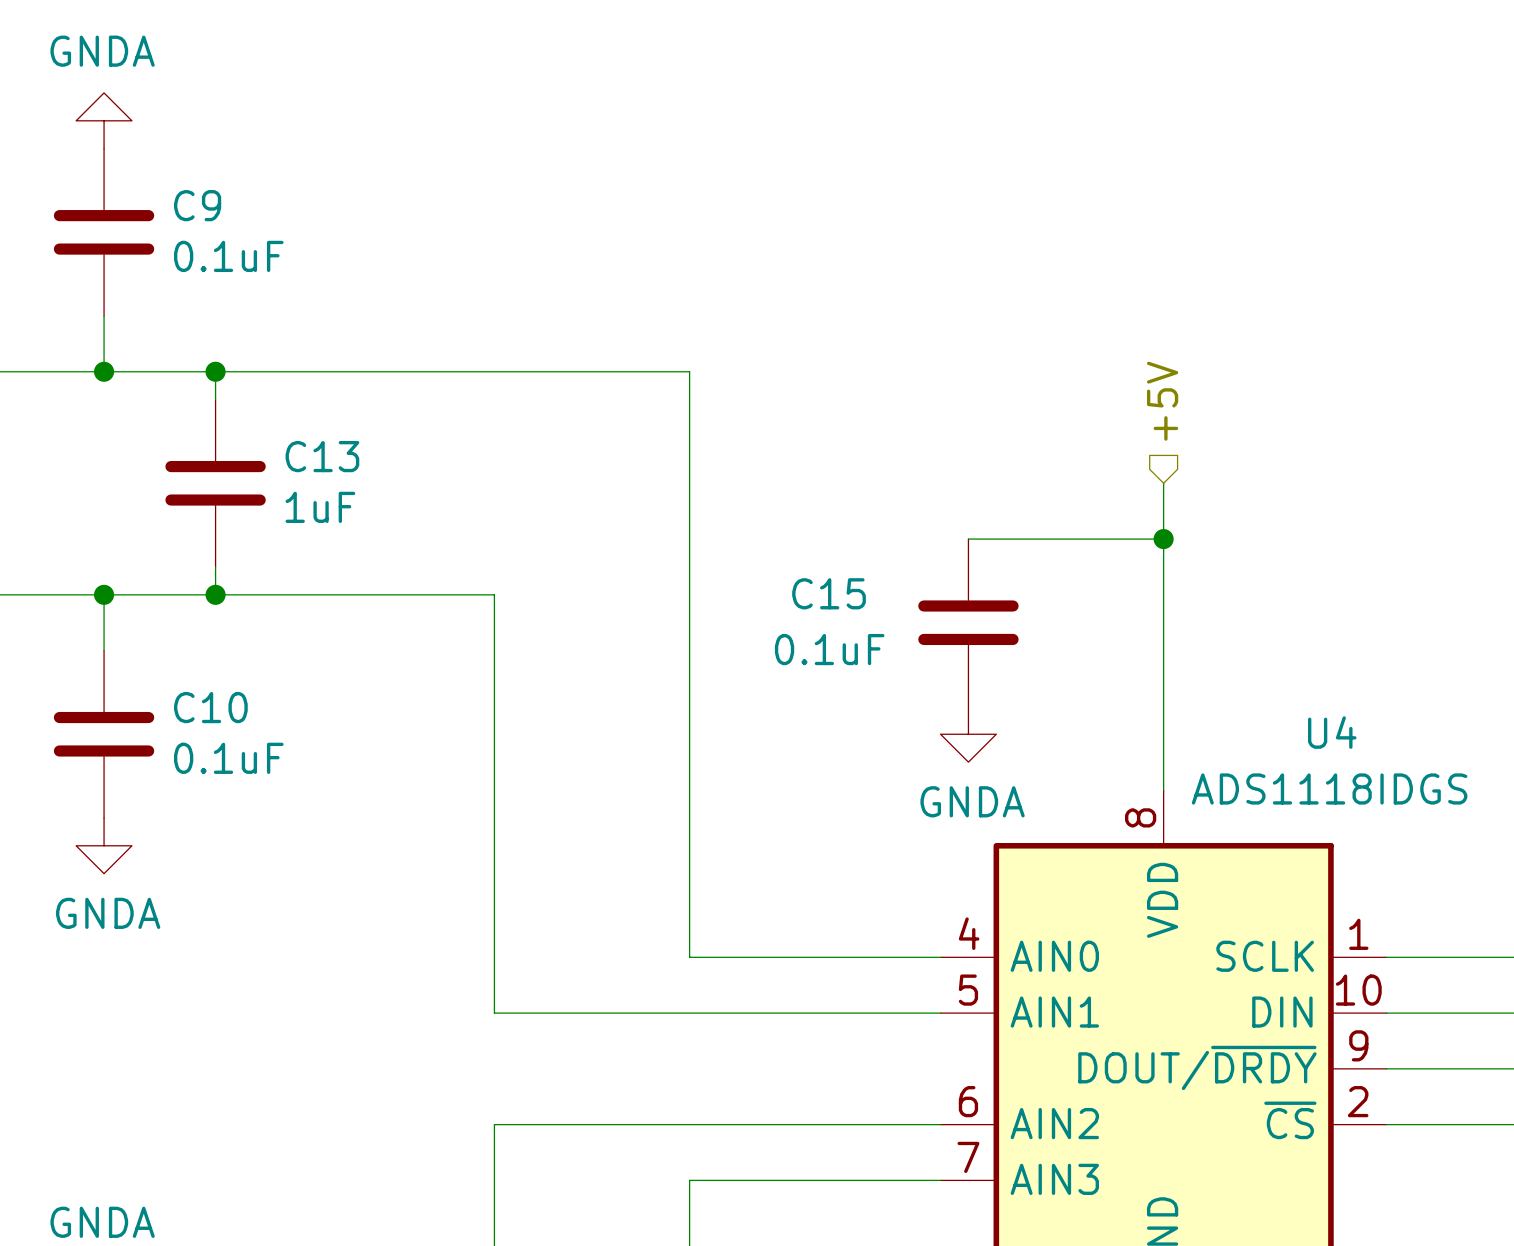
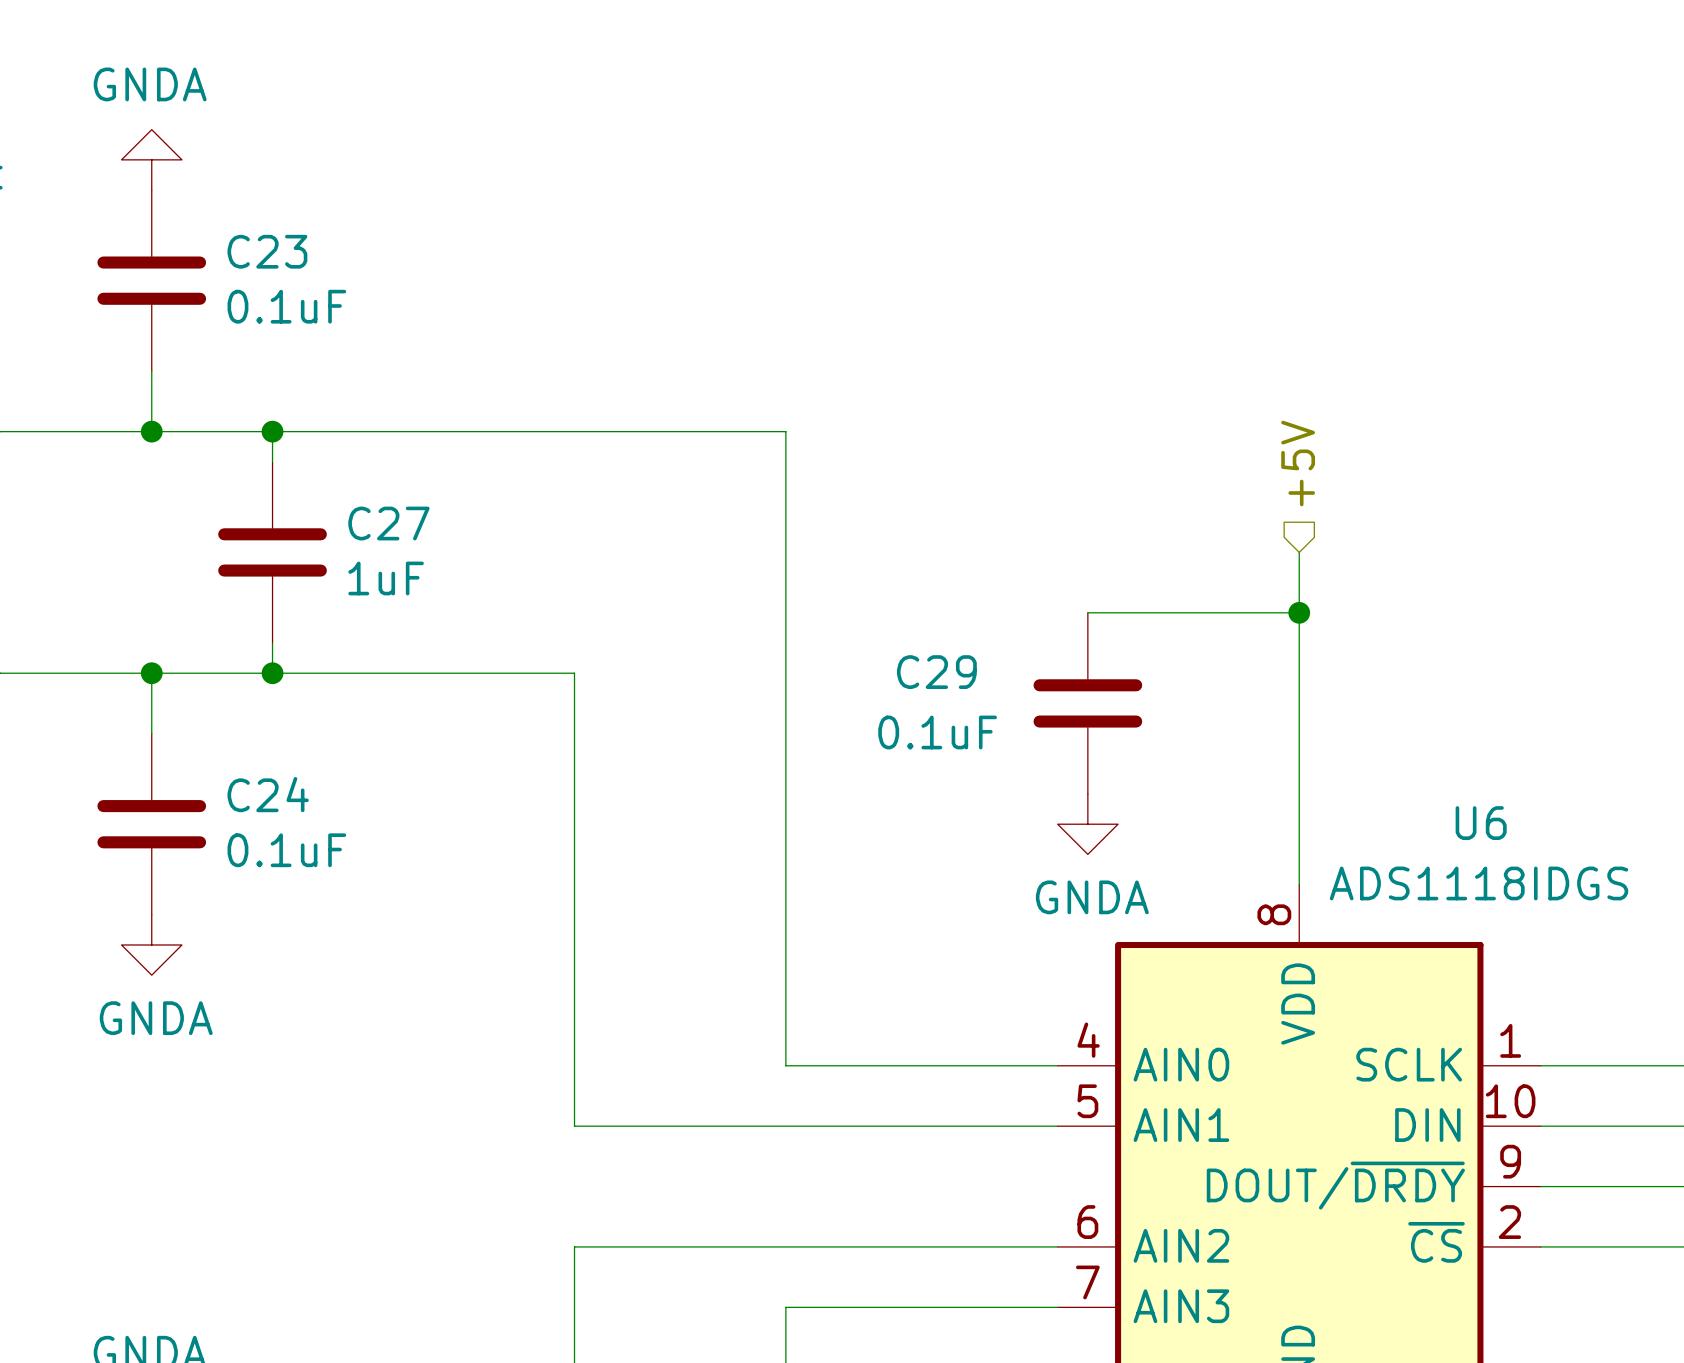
C9 name: C9 (197, 205) -> C23 (267, 251)
C13 name: C13 (322, 456) -> C27 (388, 523)
C15 name: C15 (829, 593) -> C29 (936, 672)
C10 name: C10 (210, 707) -> C24 (268, 794)
U4 name: U4 (1332, 732) -> U6 (1481, 823)

